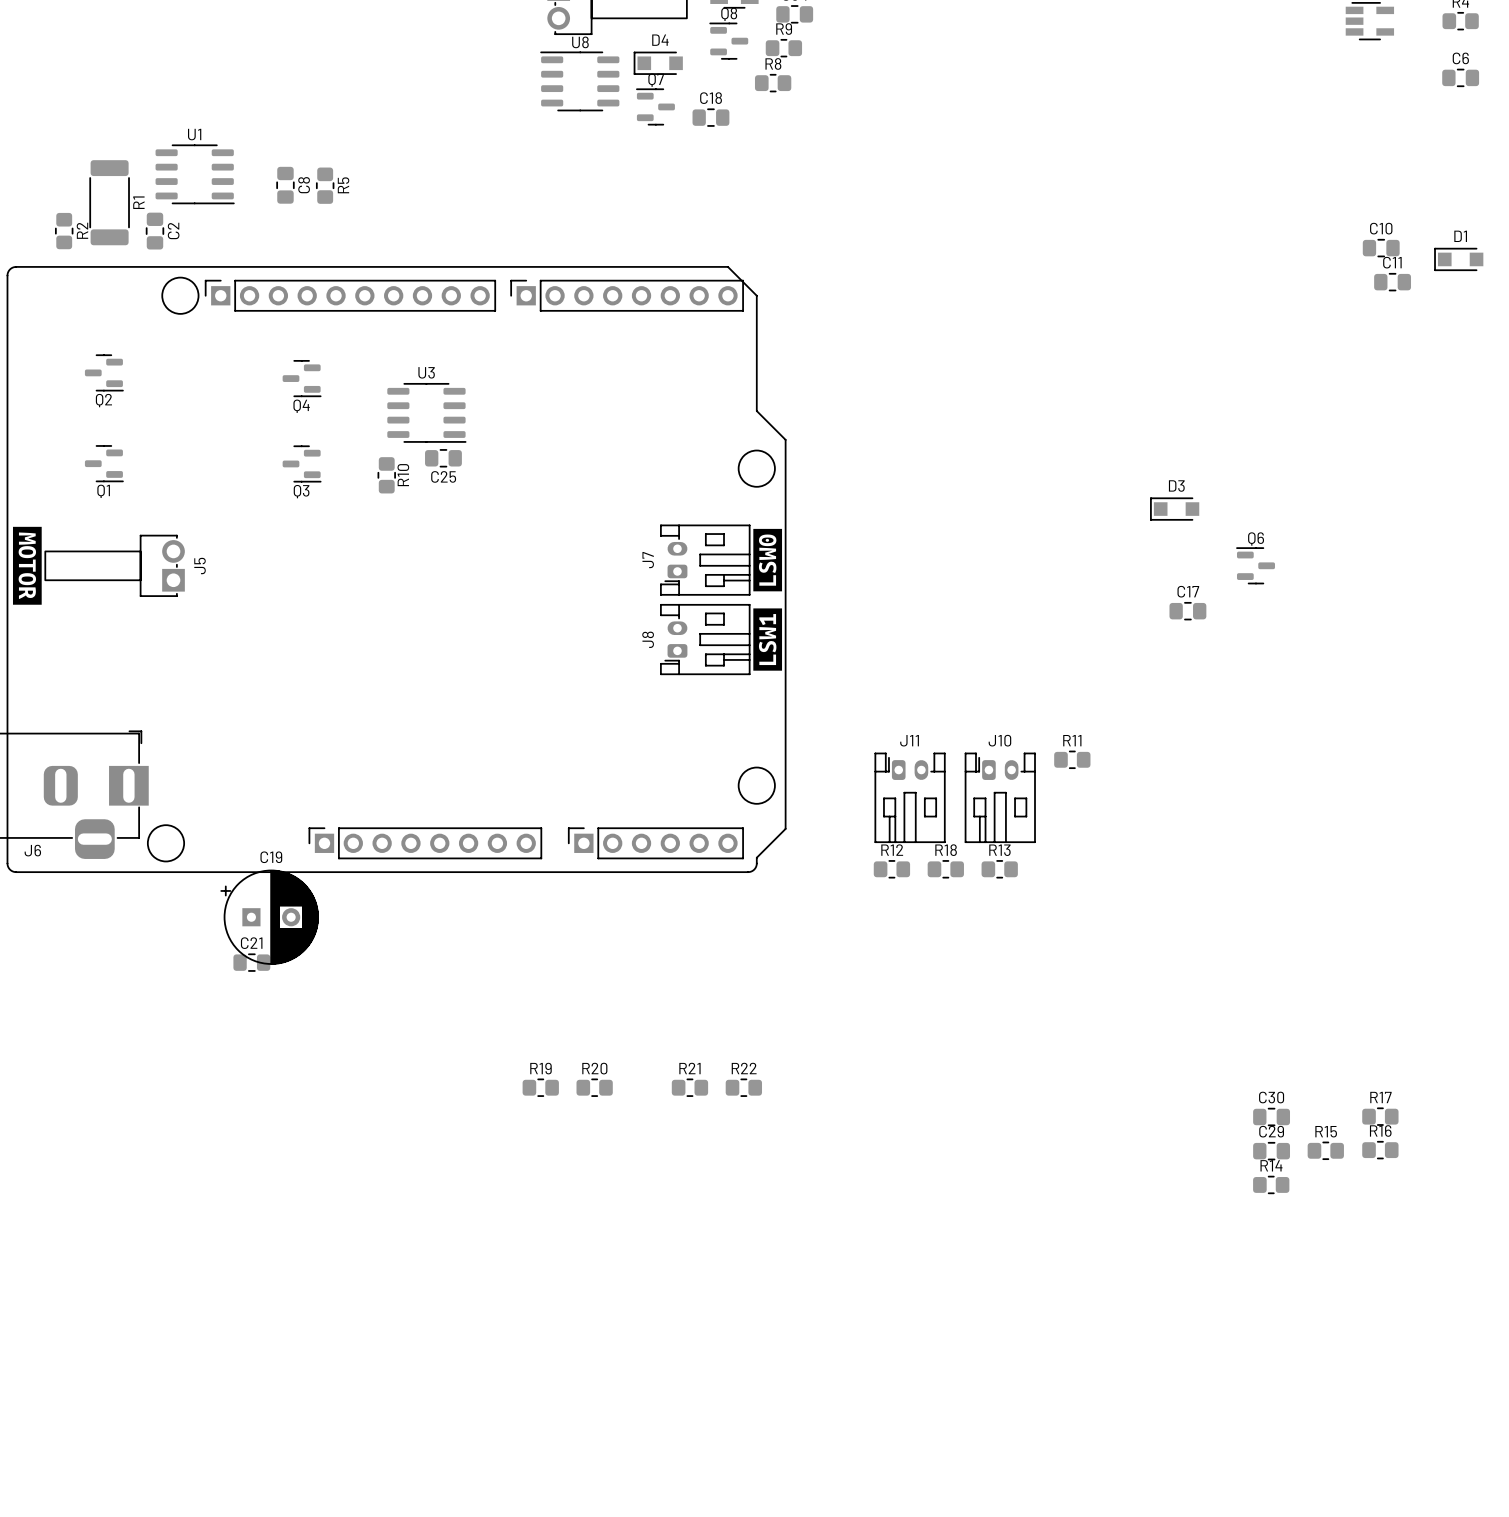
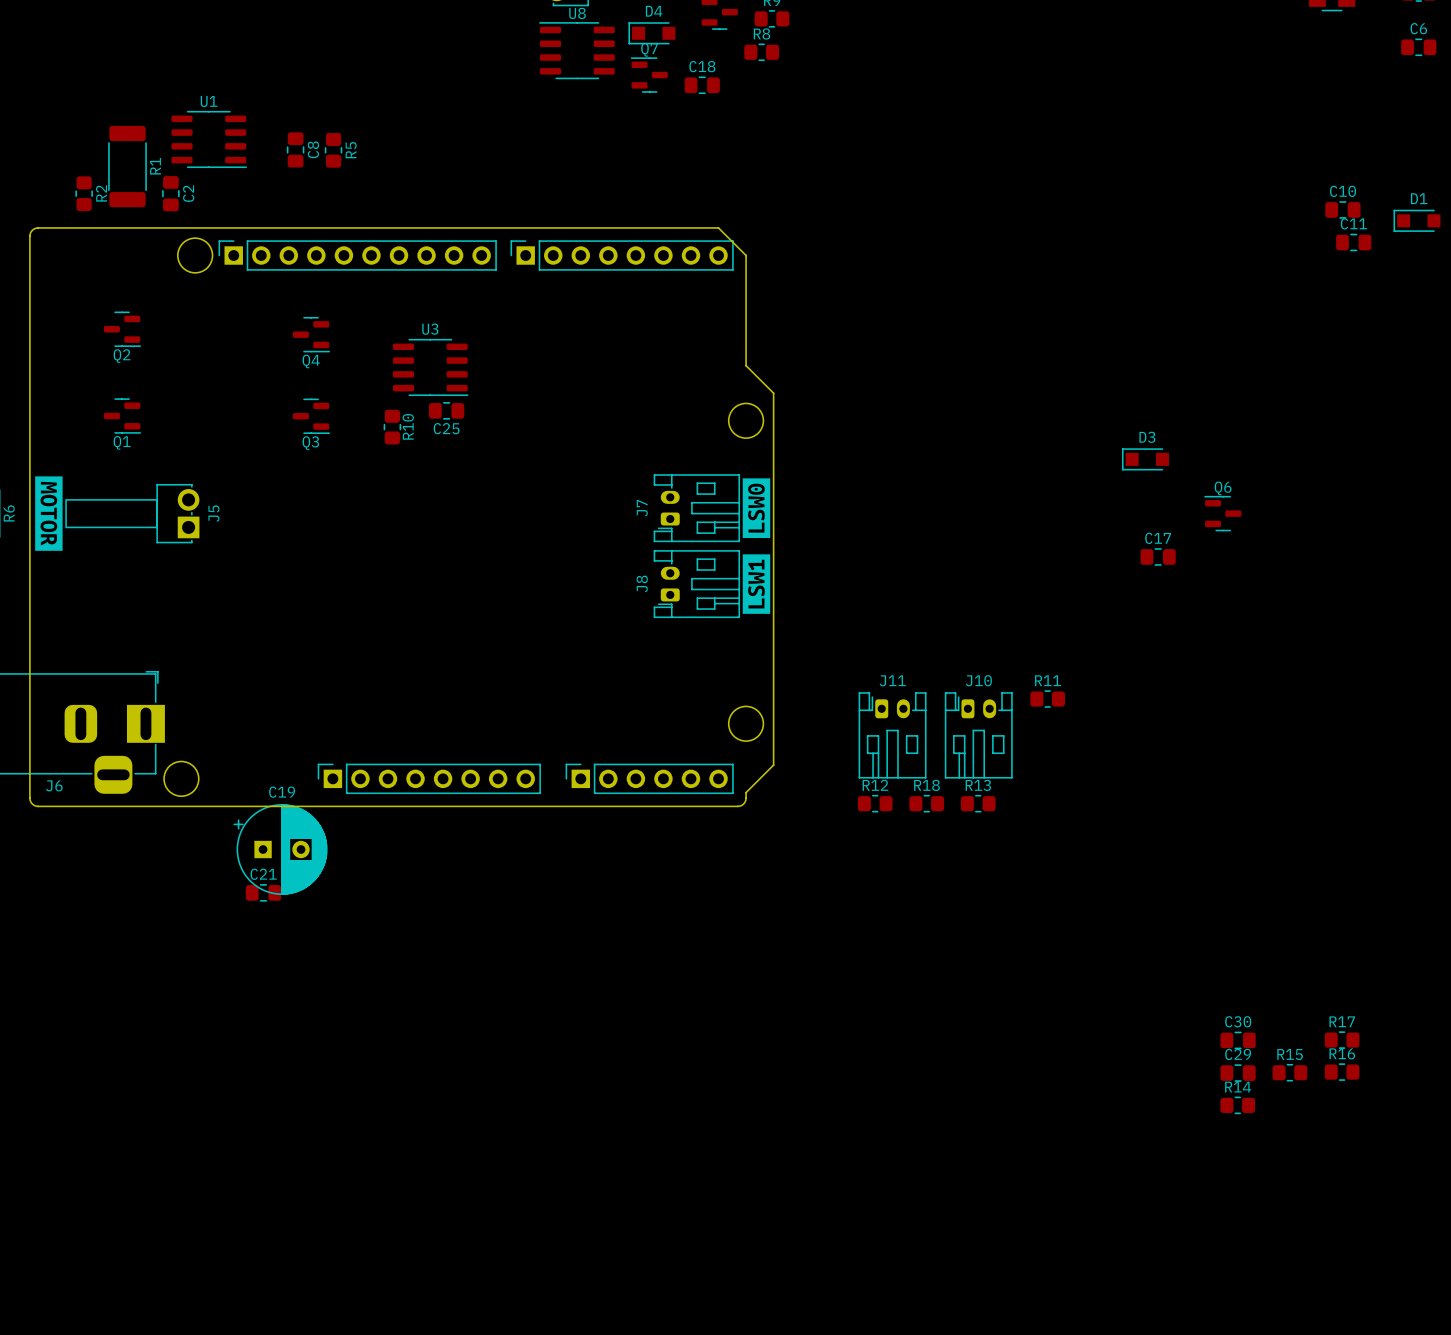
R19: (540, 1087) -> none
R20: (594, 1087) -> none
R21: (689, 1087) -> none
R22: (743, 1087) -> none

